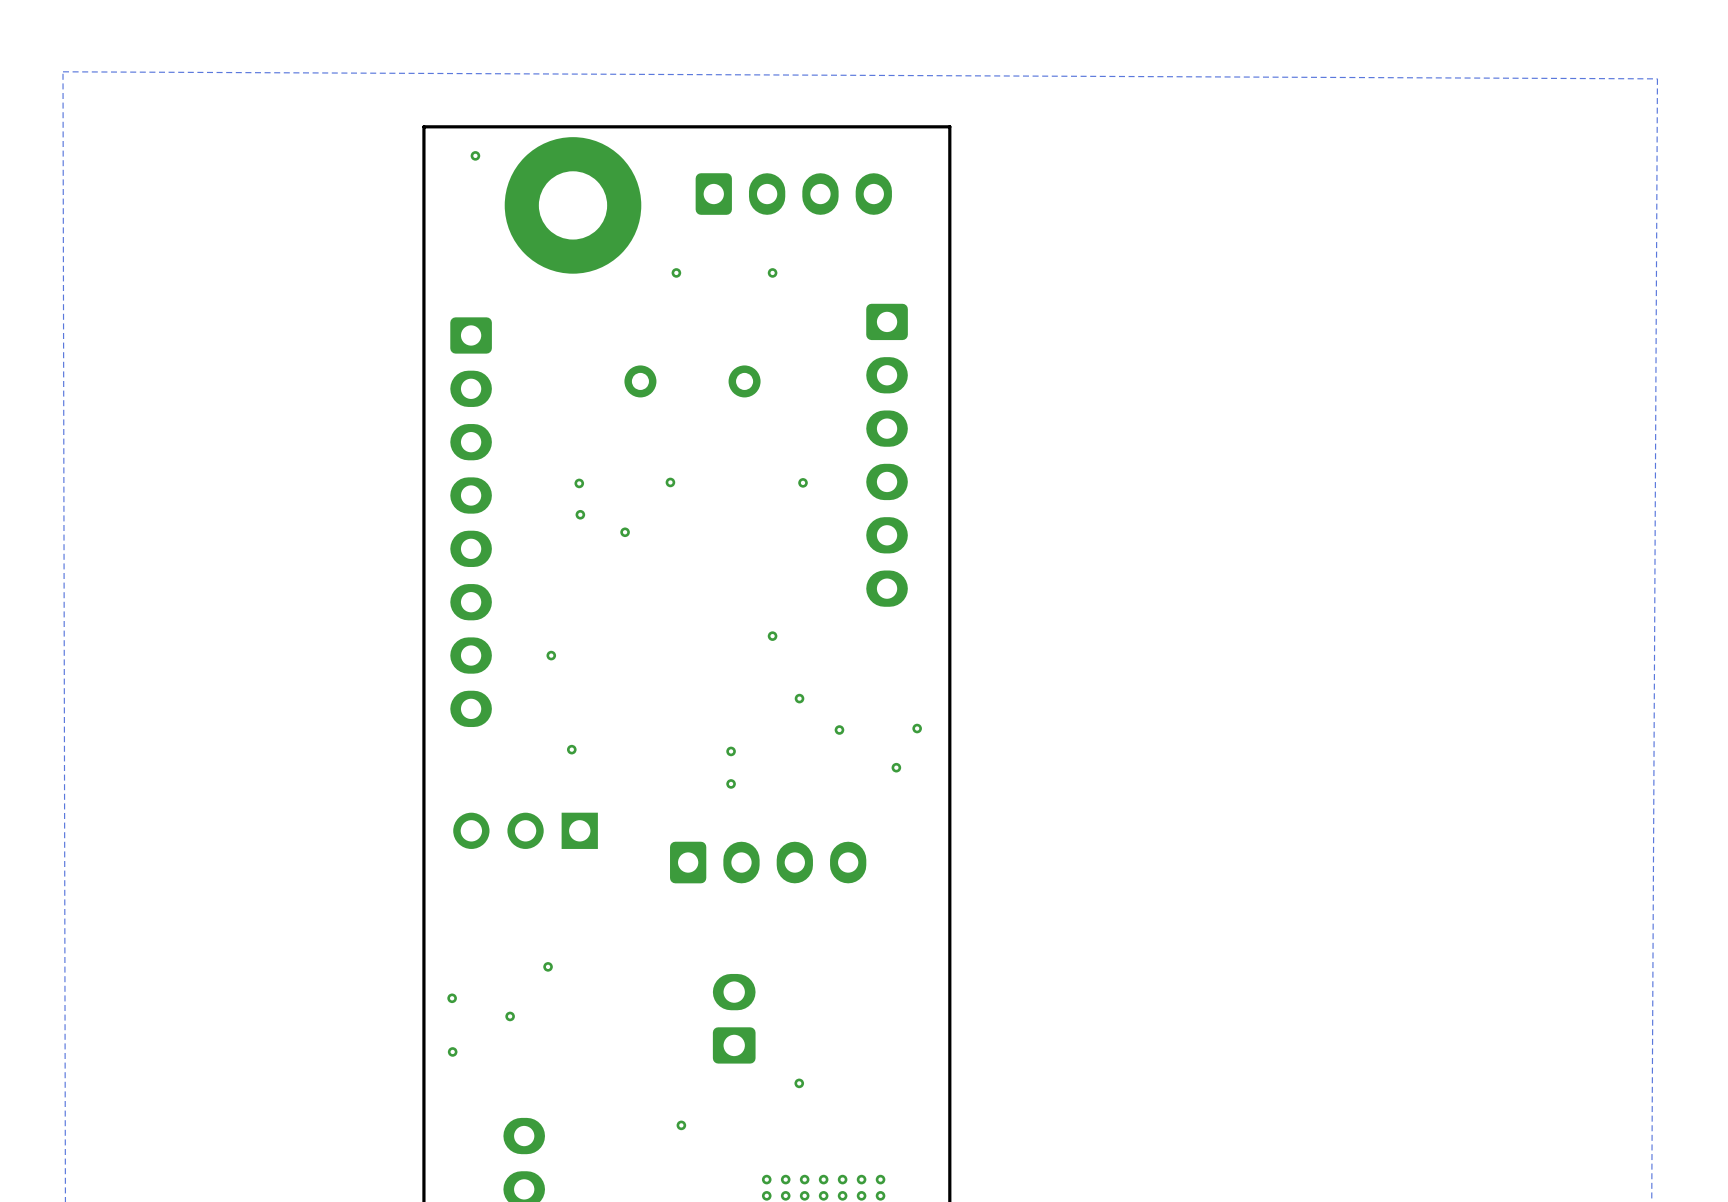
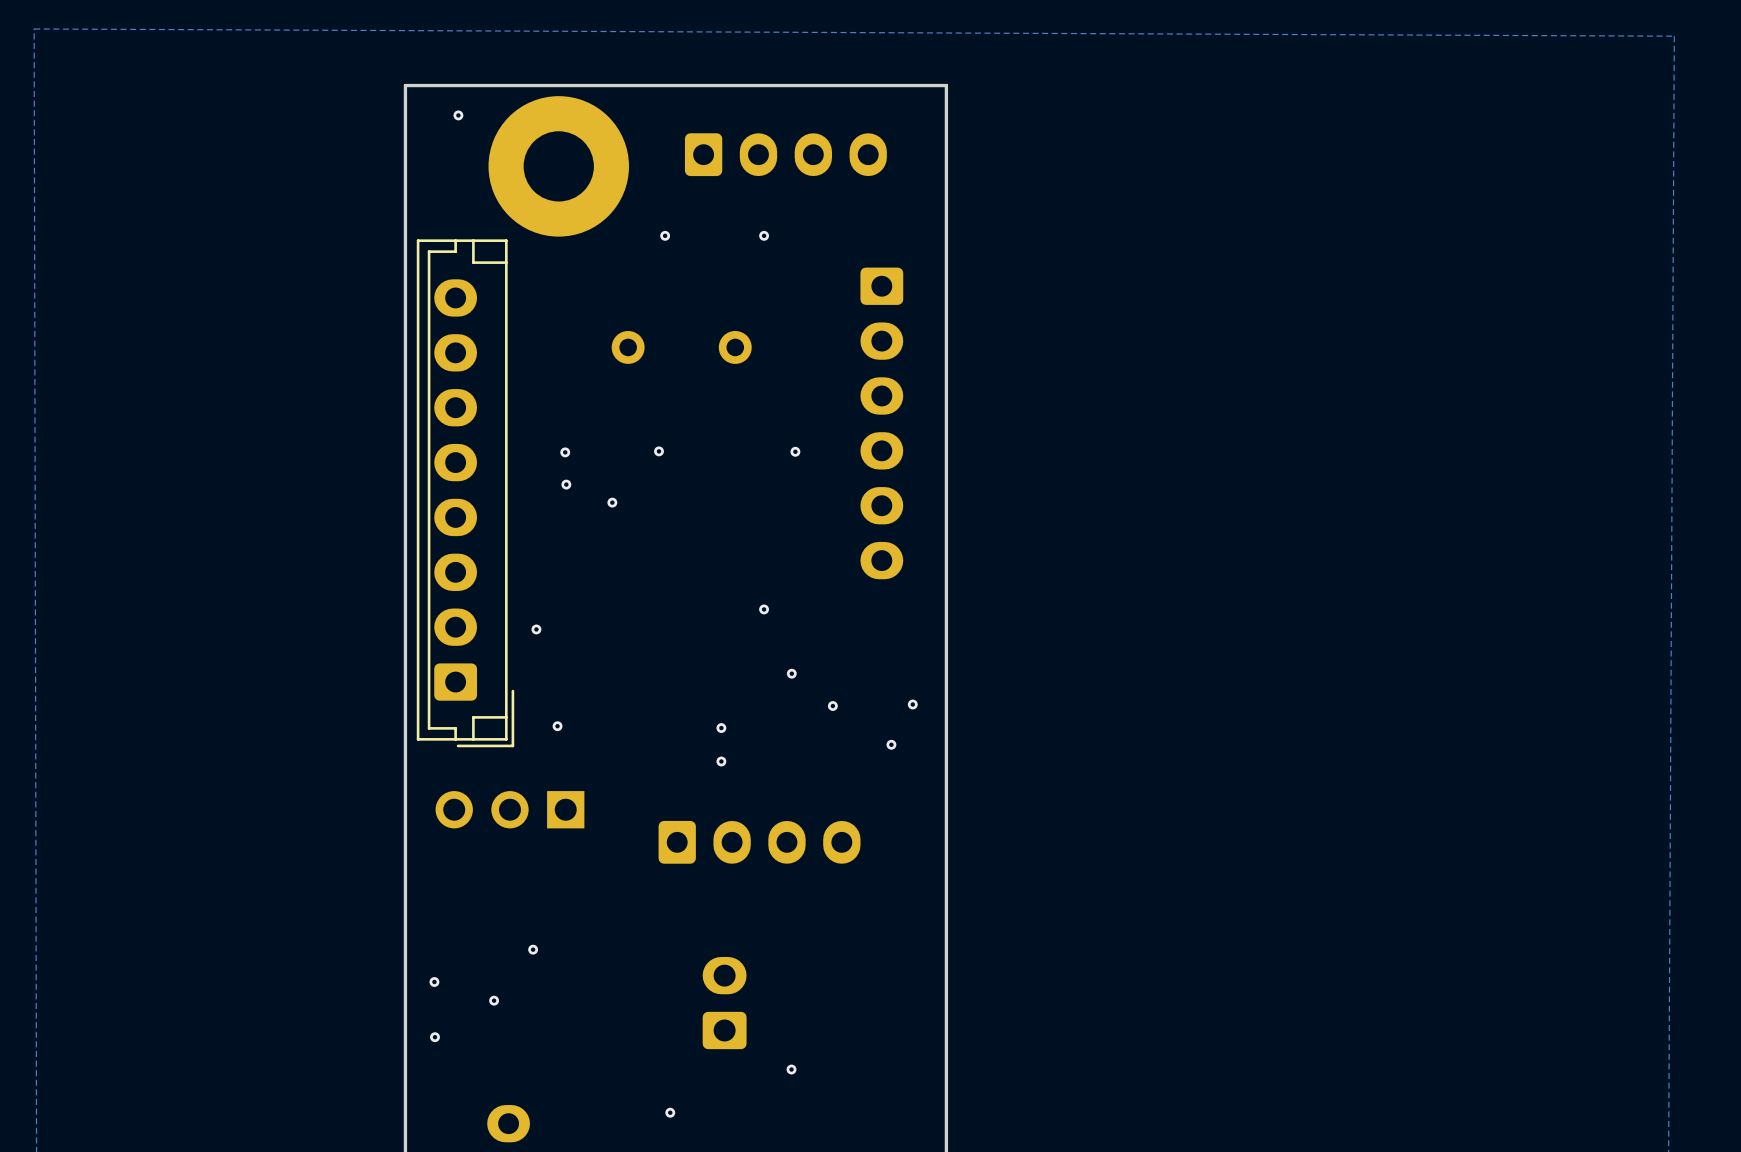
part side: top (471, 522) -> bottom (465, 493)

